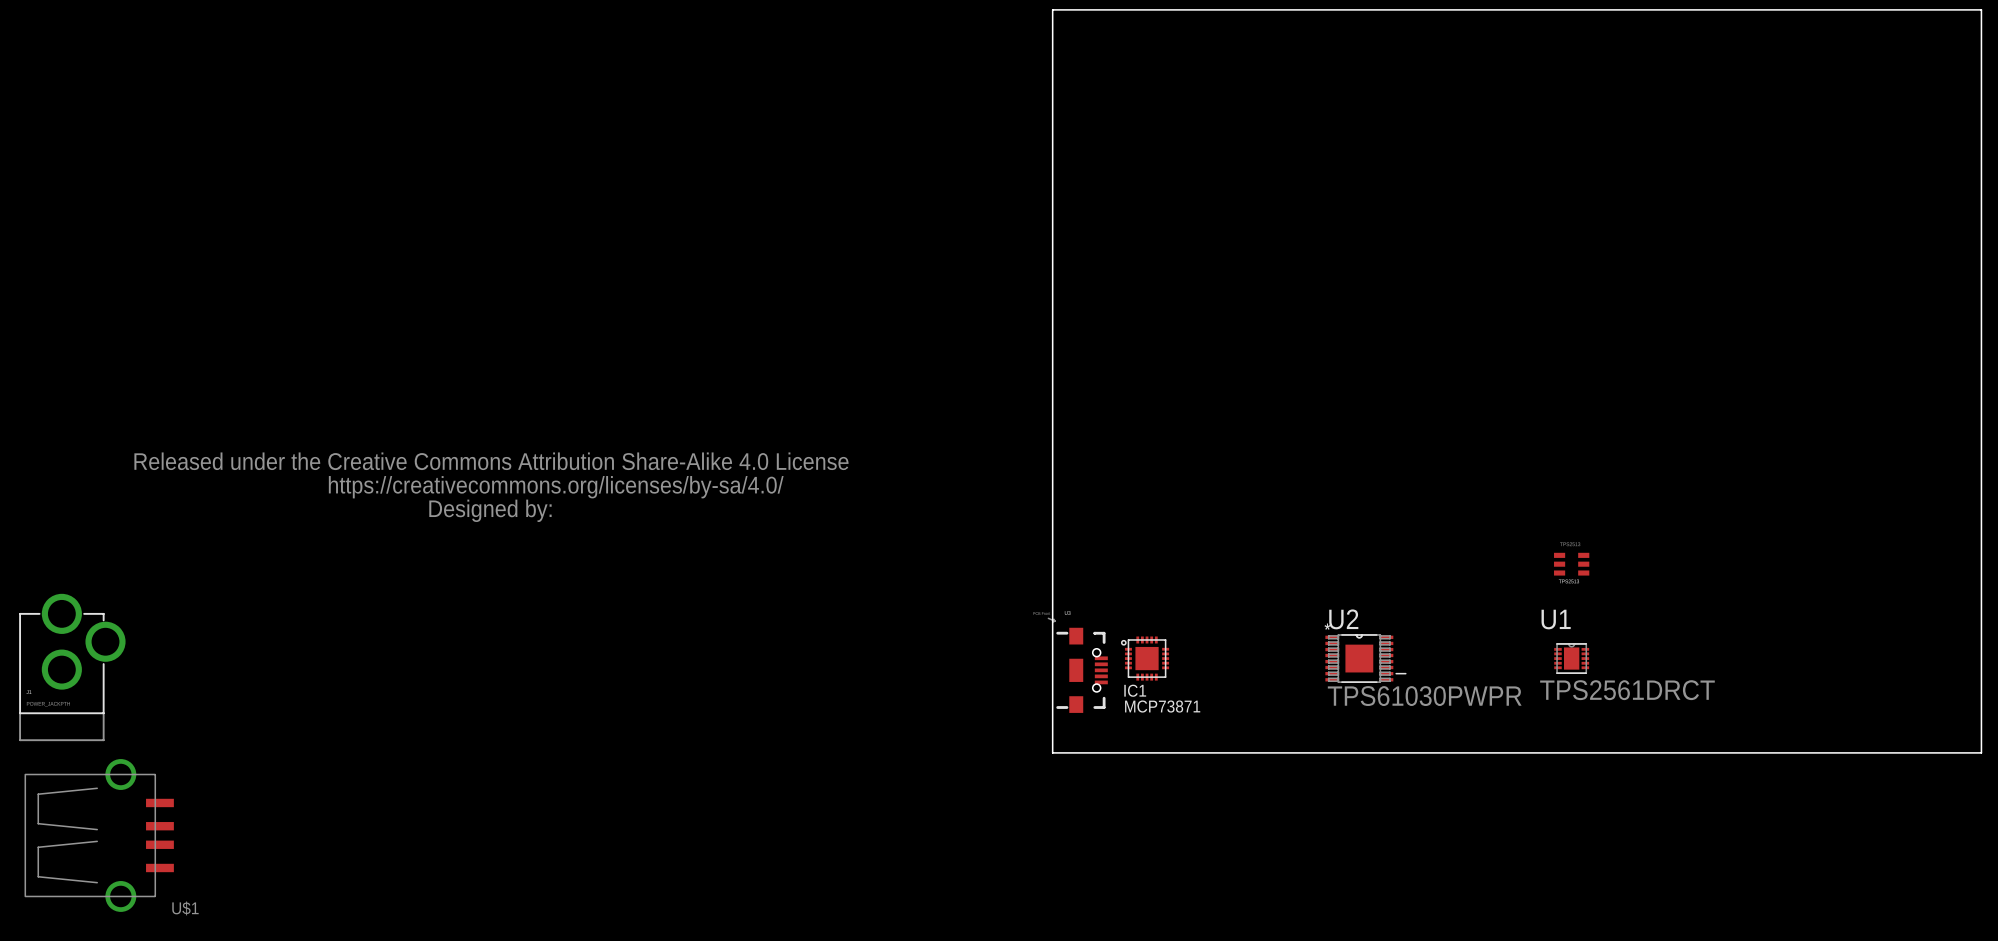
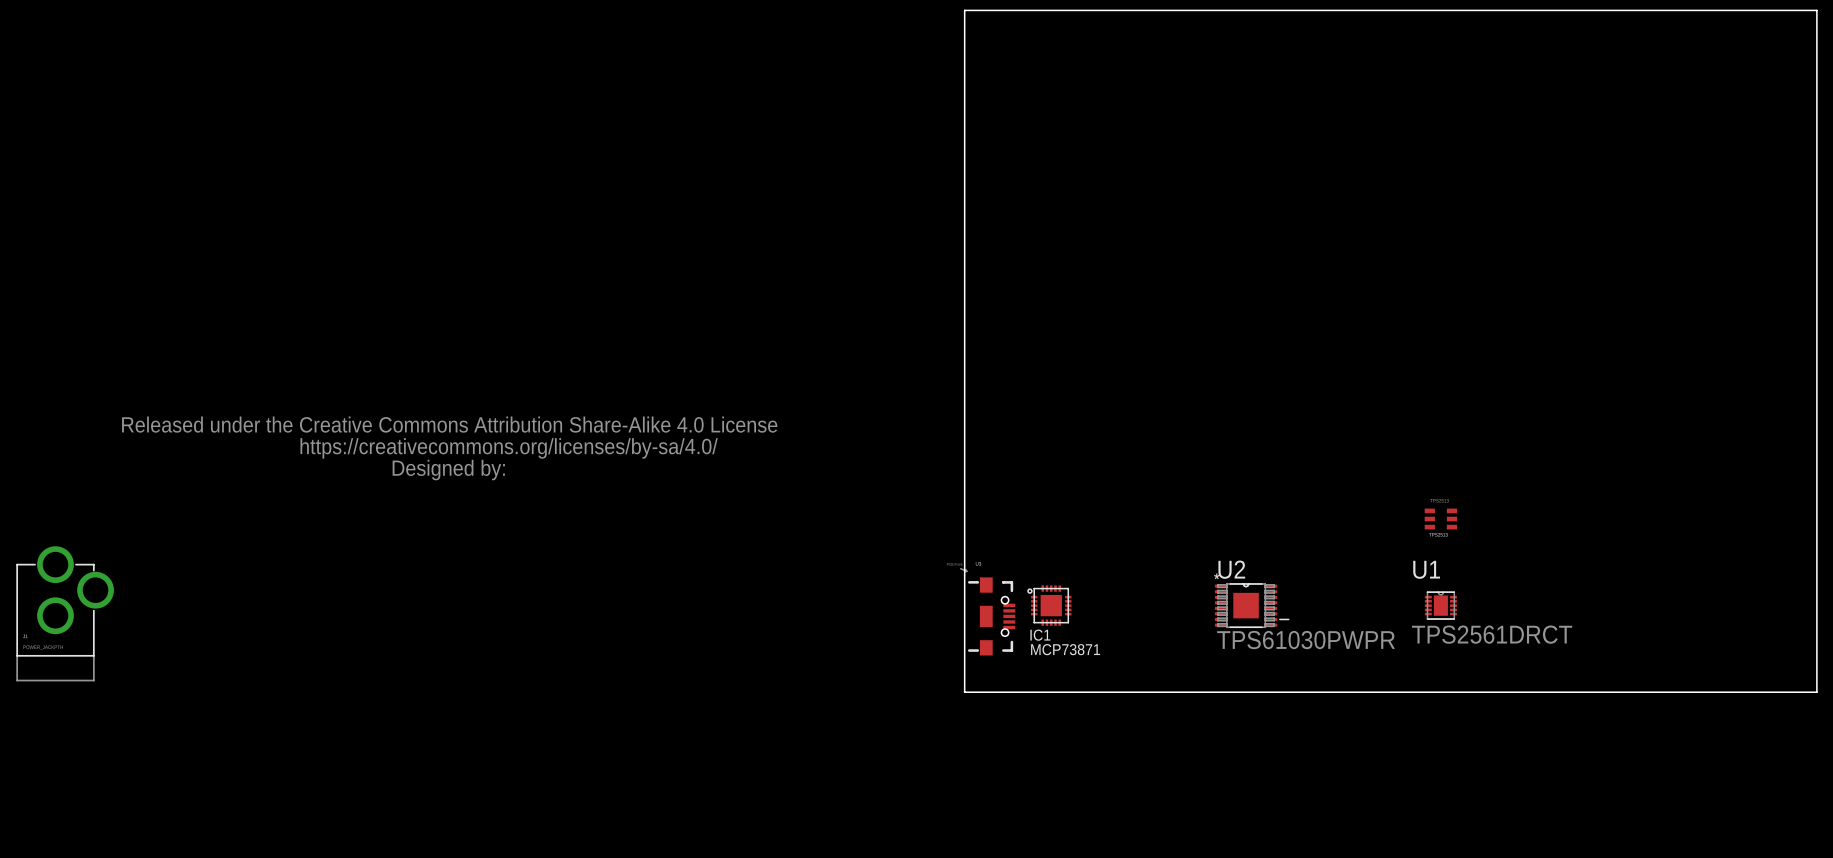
U$1: (99, 835) -> none

